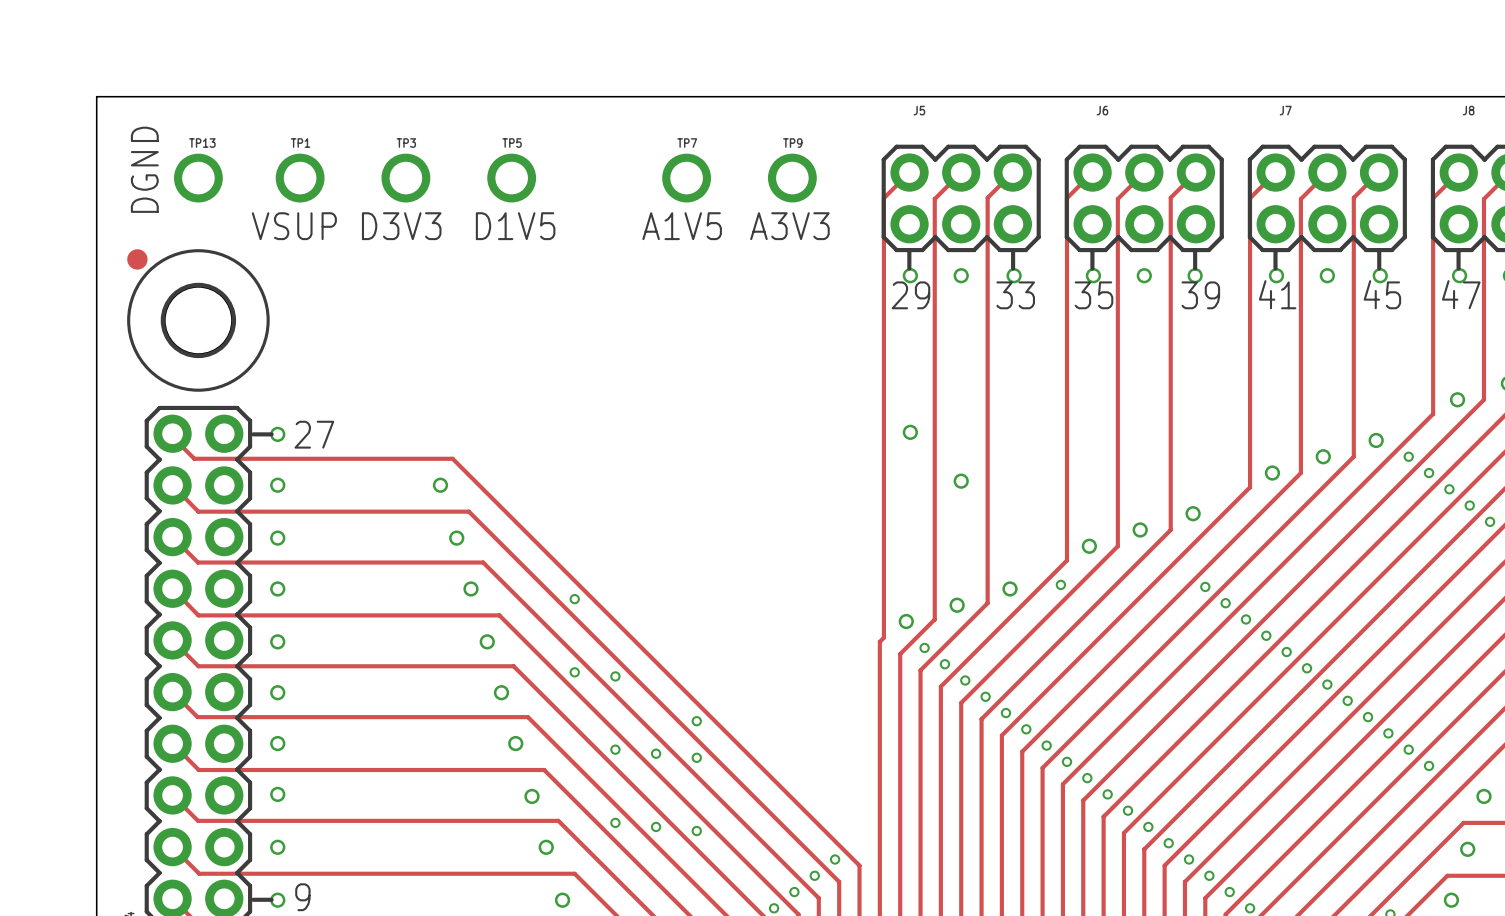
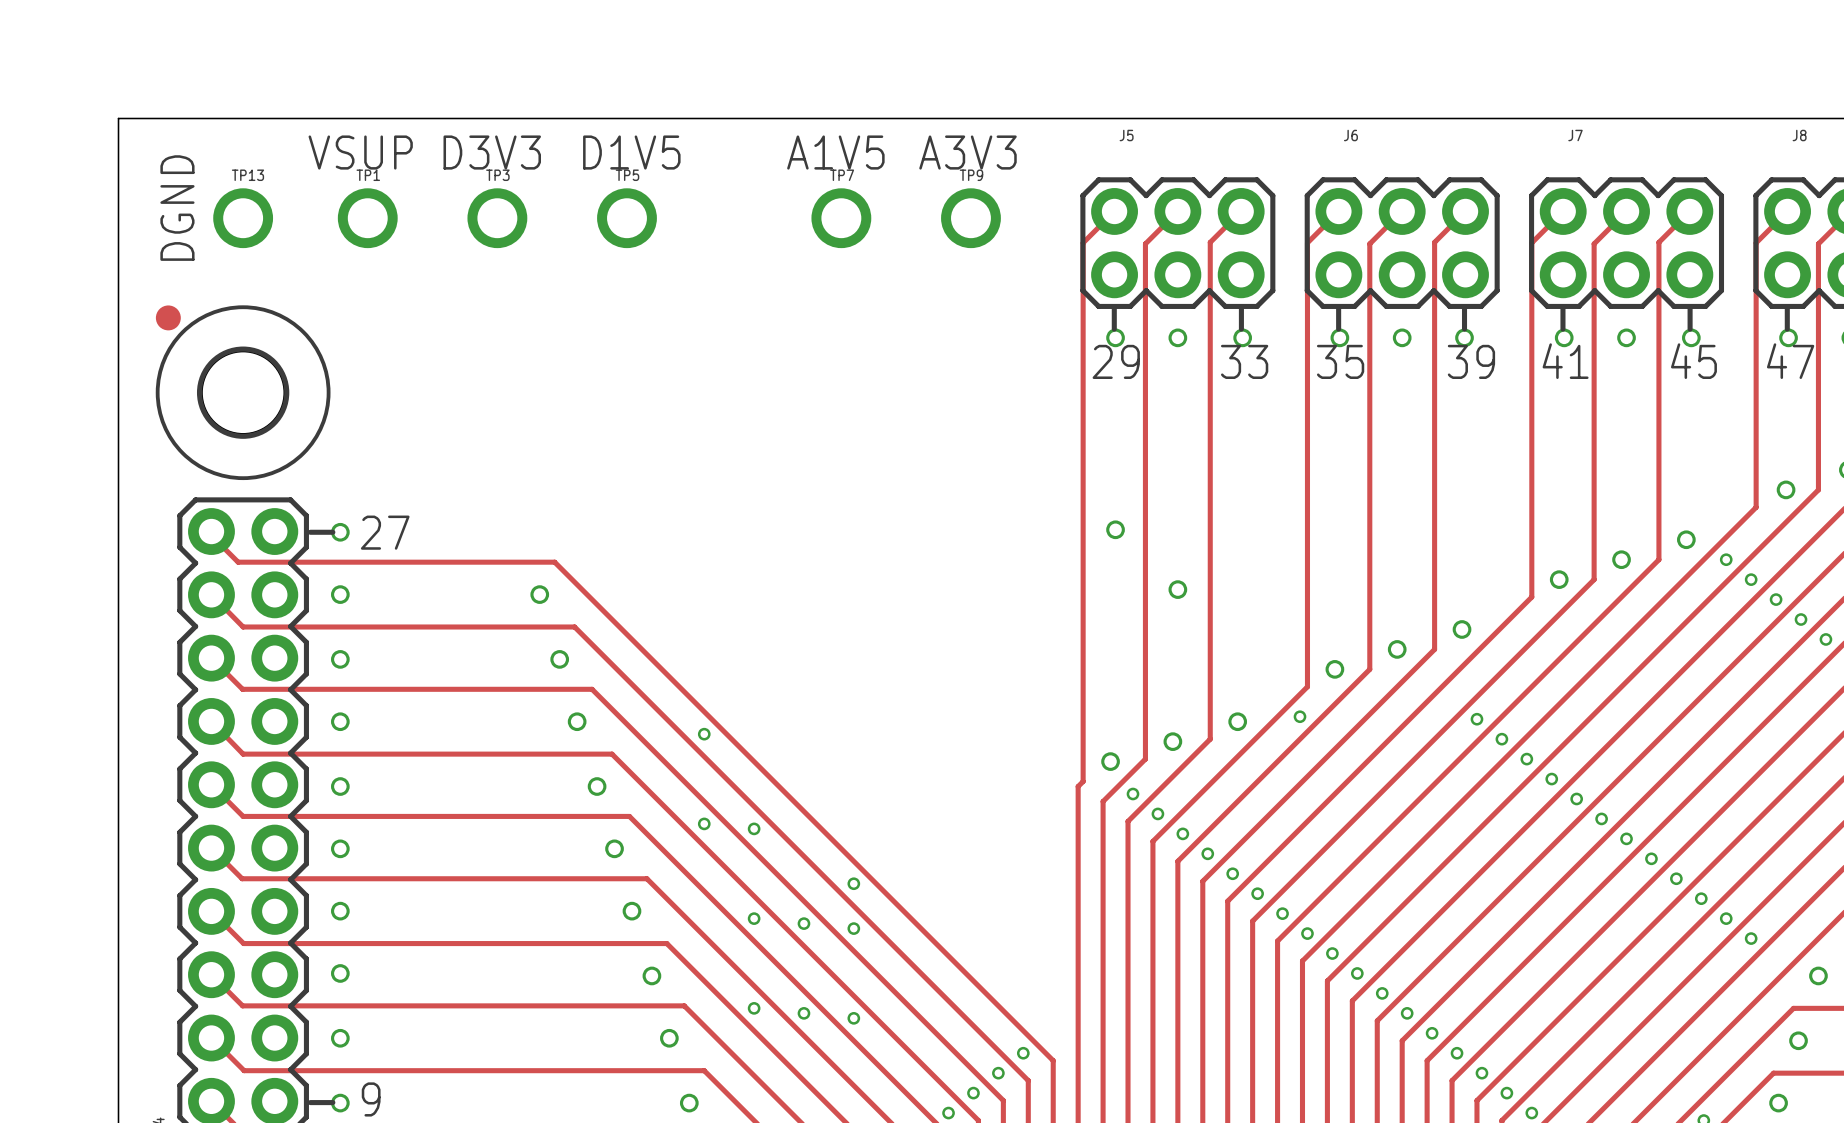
text position: VSUP (294, 226) -> VSUP (360, 152)
text position: D3V3 (401, 226) -> D3V3 (492, 152)
text position: D1V5 (515, 226) -> D1V5 (631, 152)
text position: A1V5 (682, 226) -> A1V5 (835, 152)
text position: A3V3 (789, 226) -> A3V3 (968, 152)

